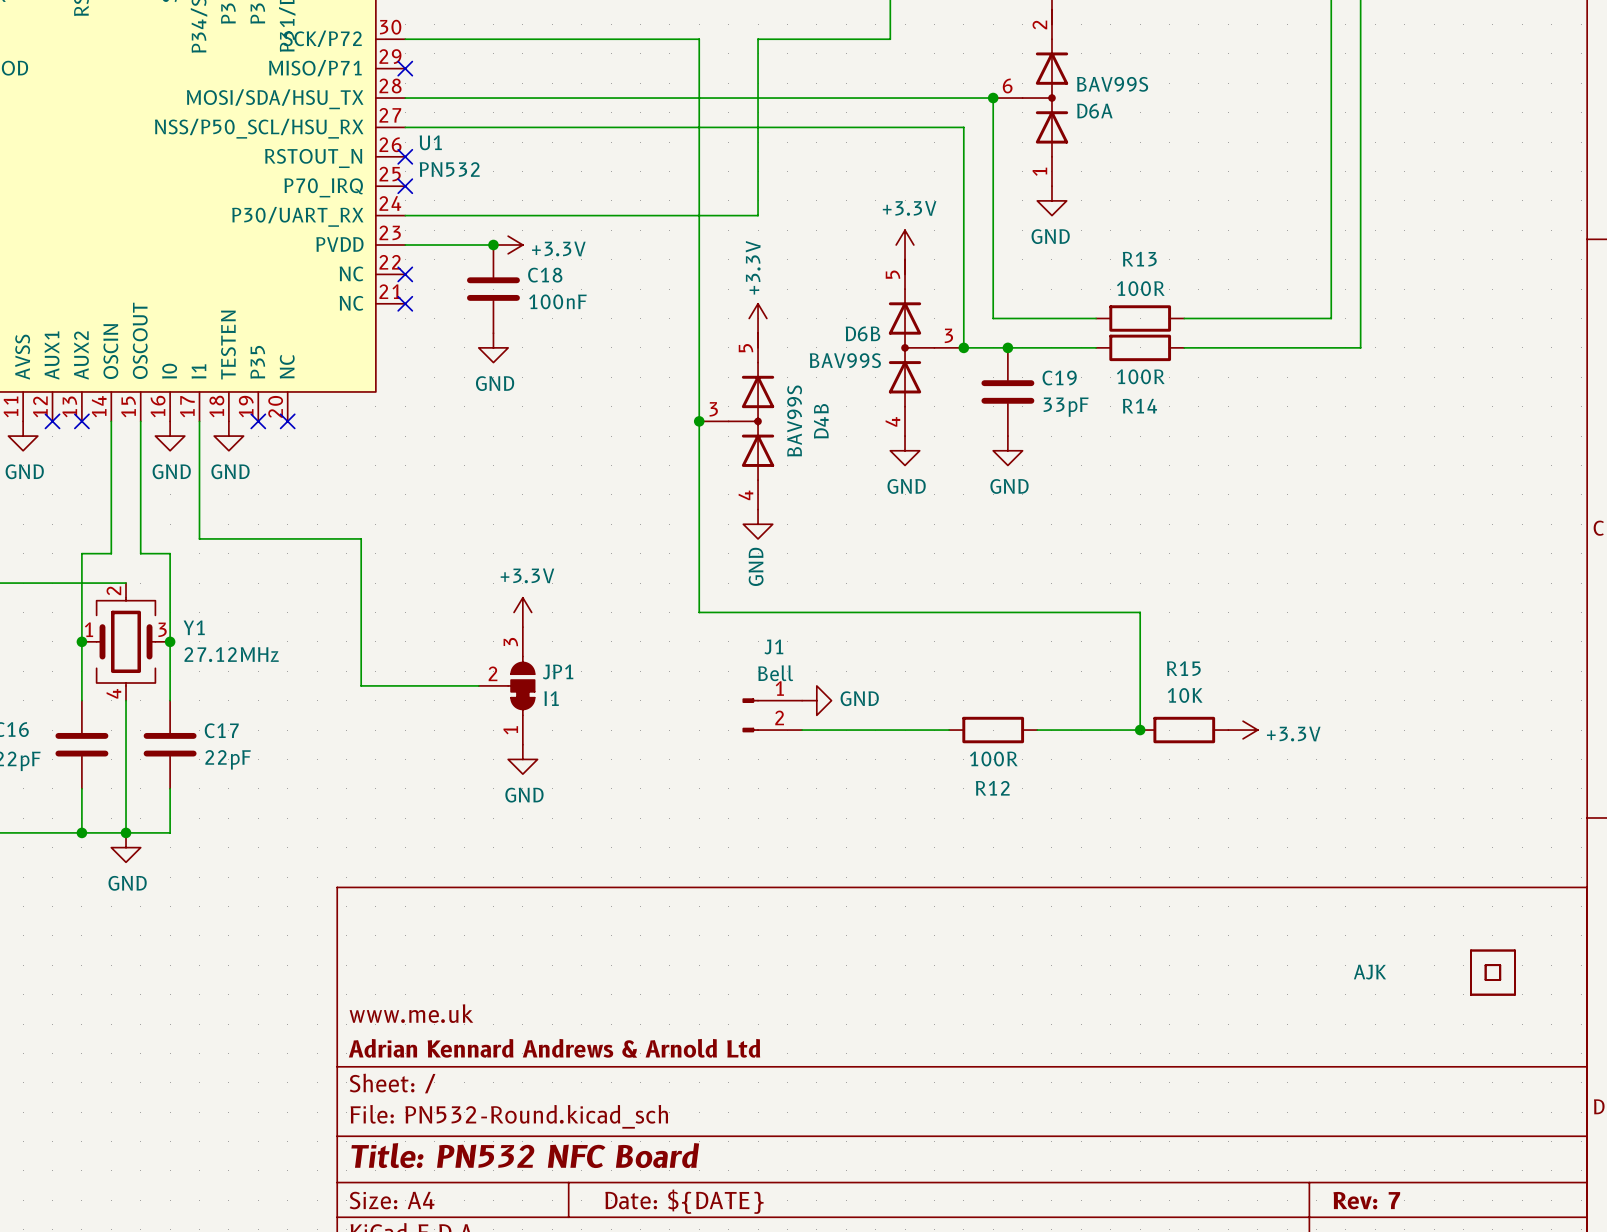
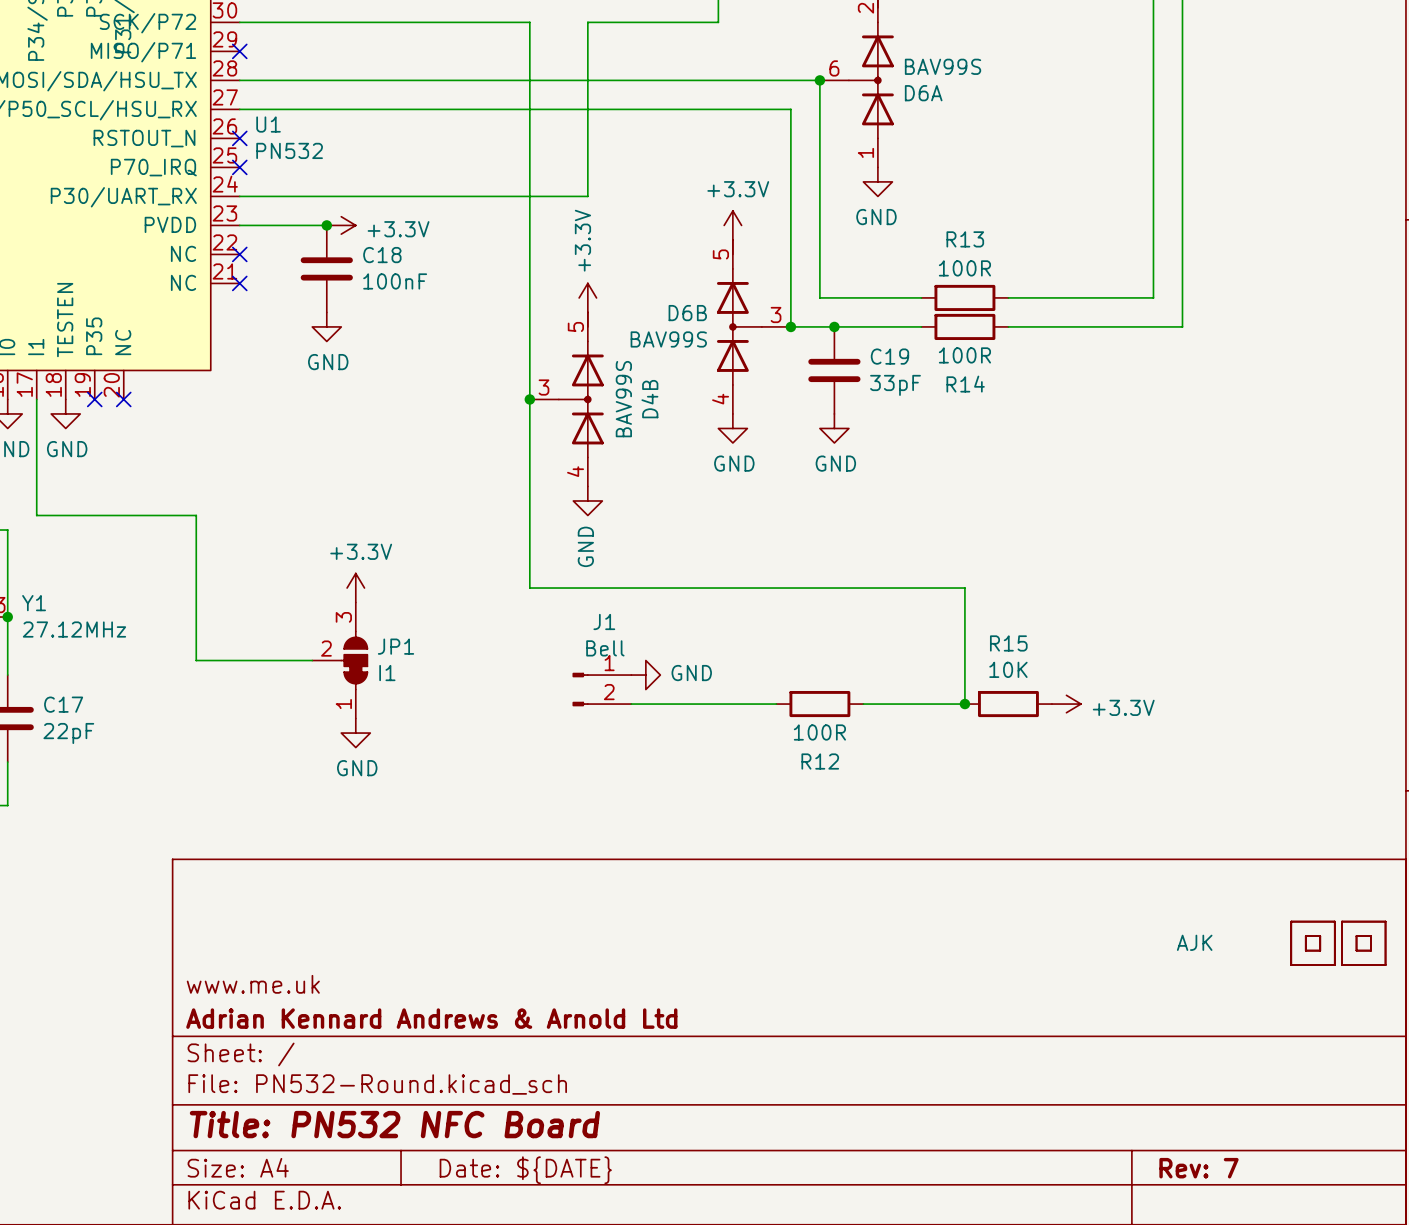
part: none -> (1363, 943)

